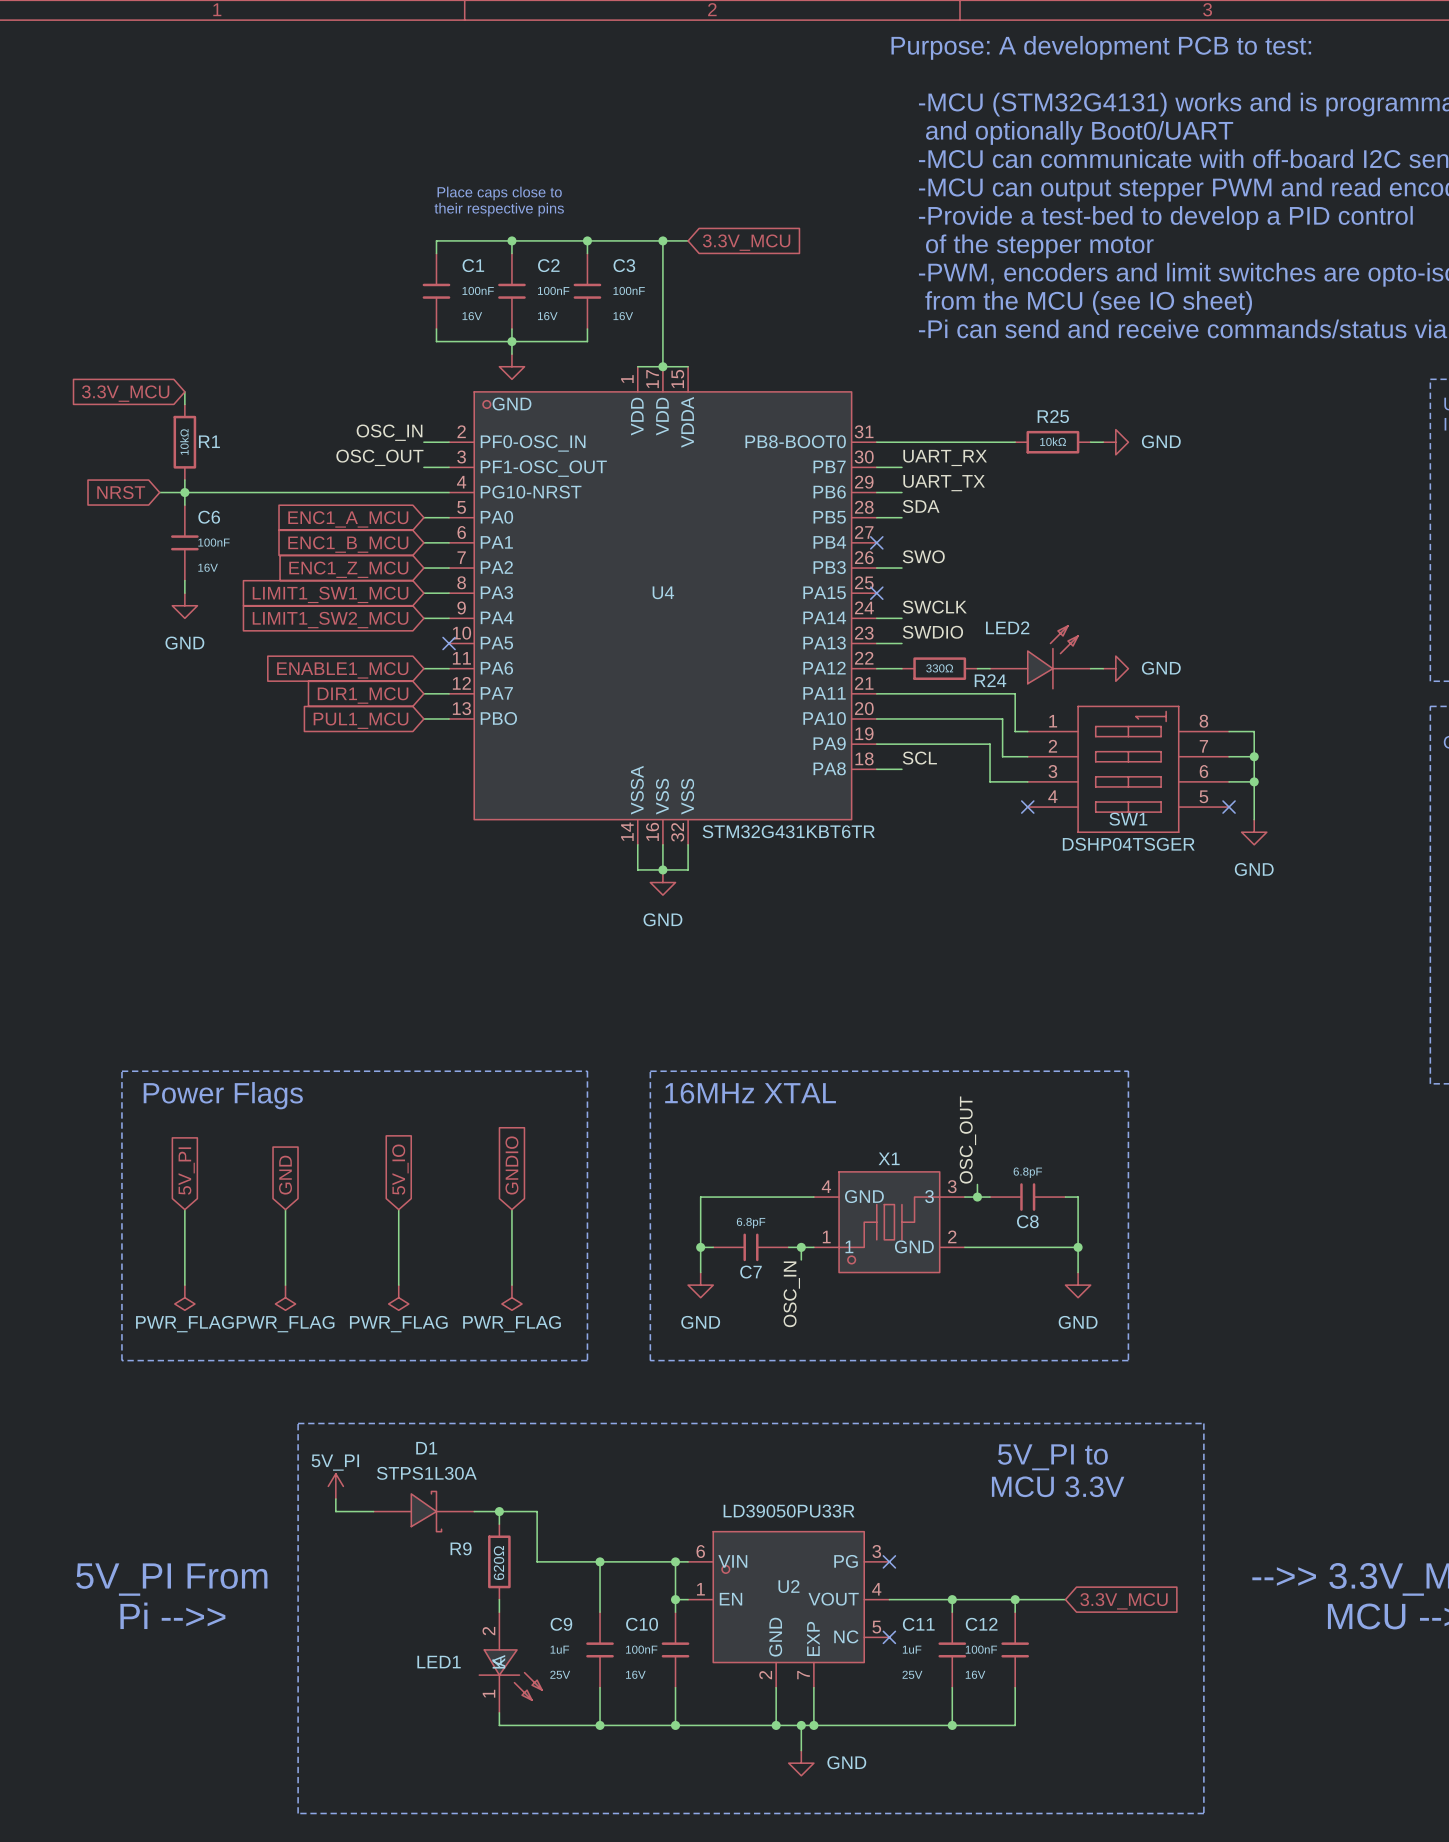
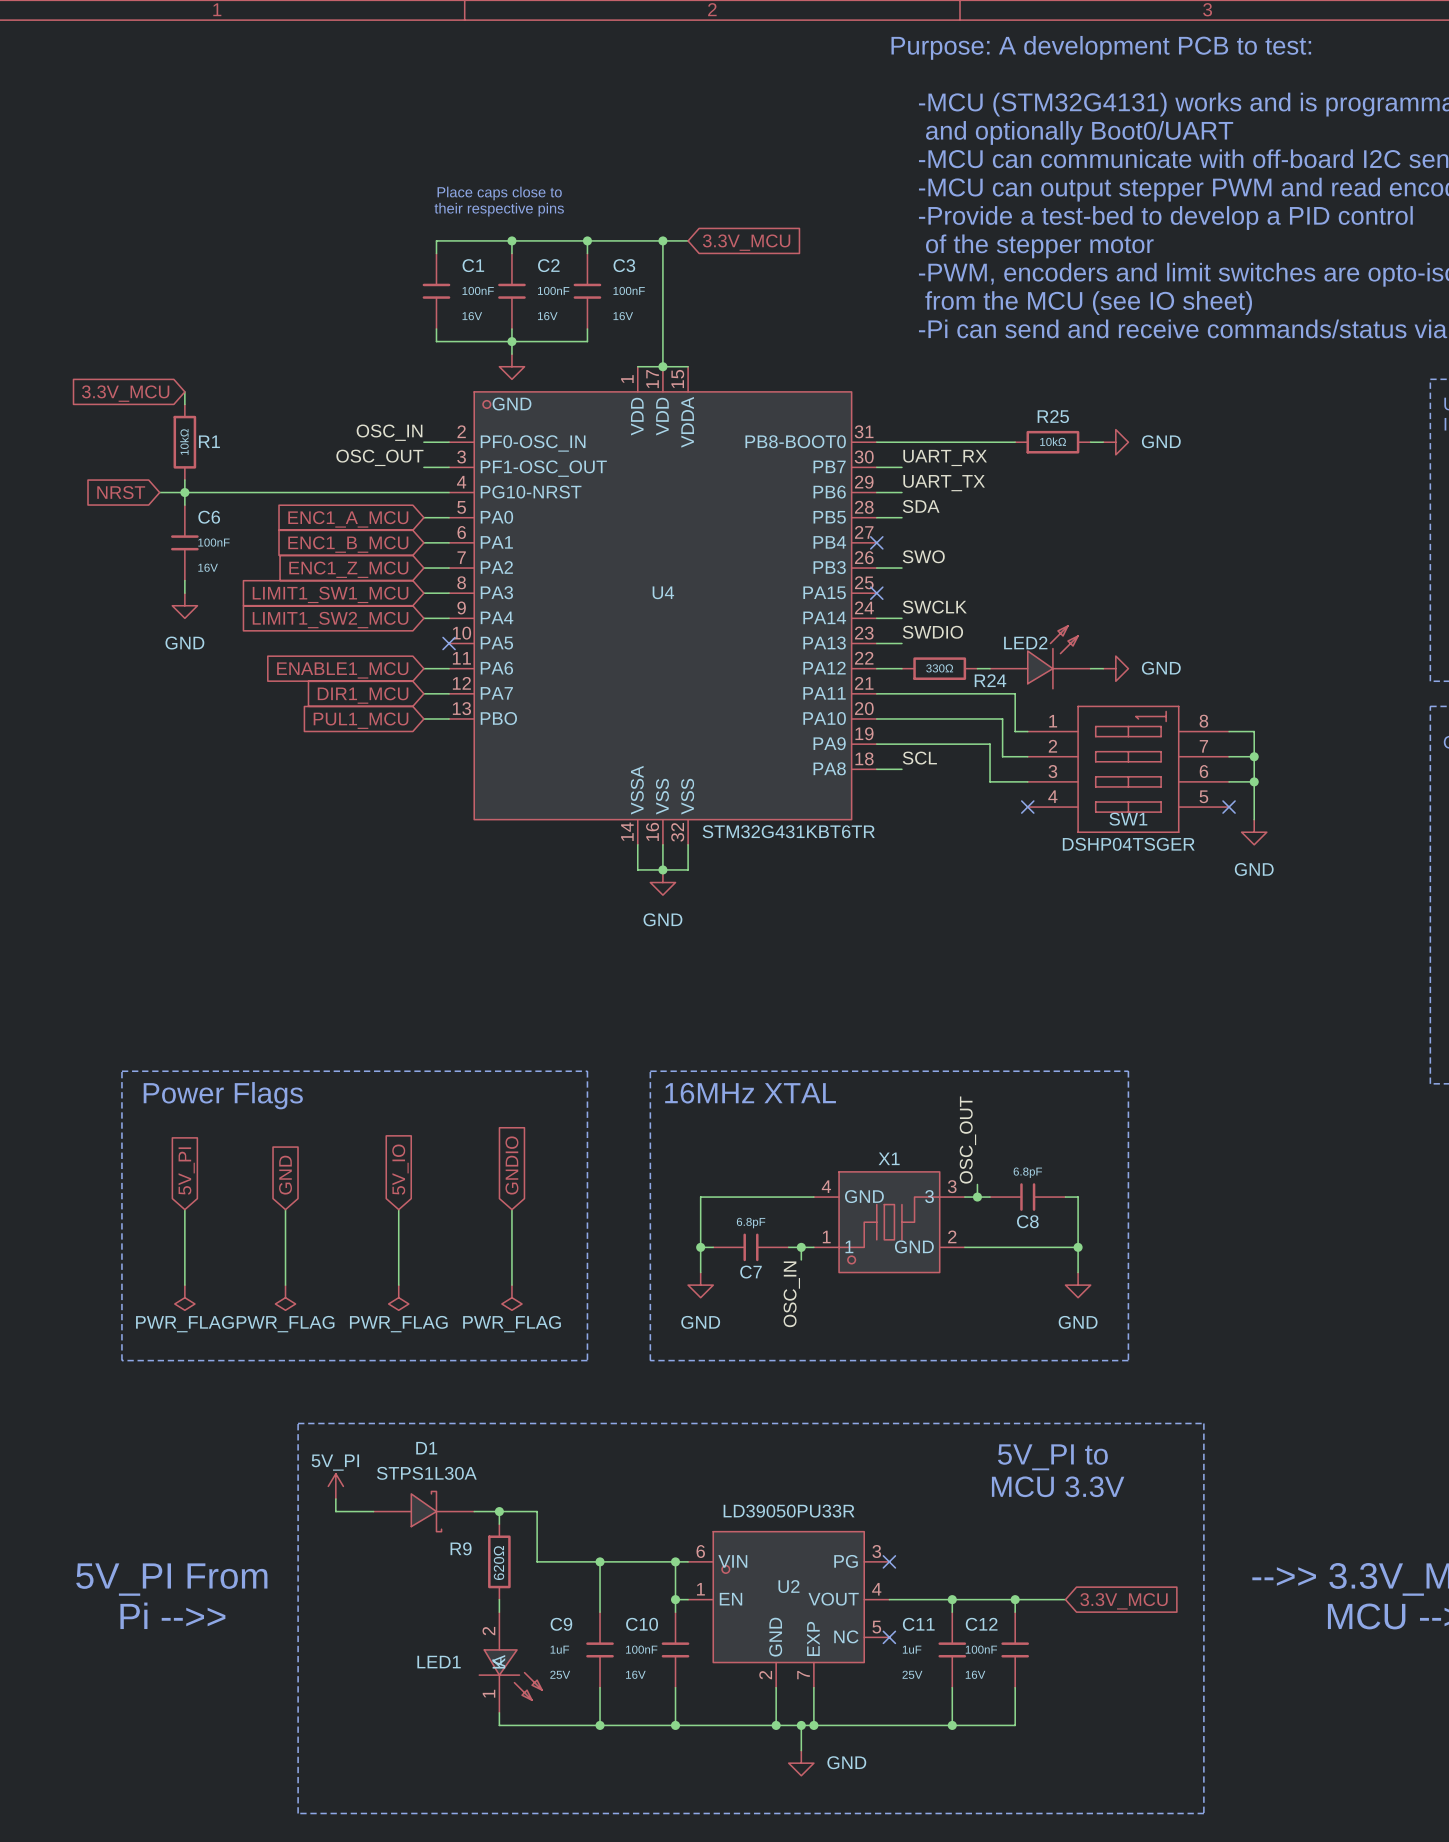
LED2 name position: LED2 (1007, 627) -> LED2 (1025, 642)

